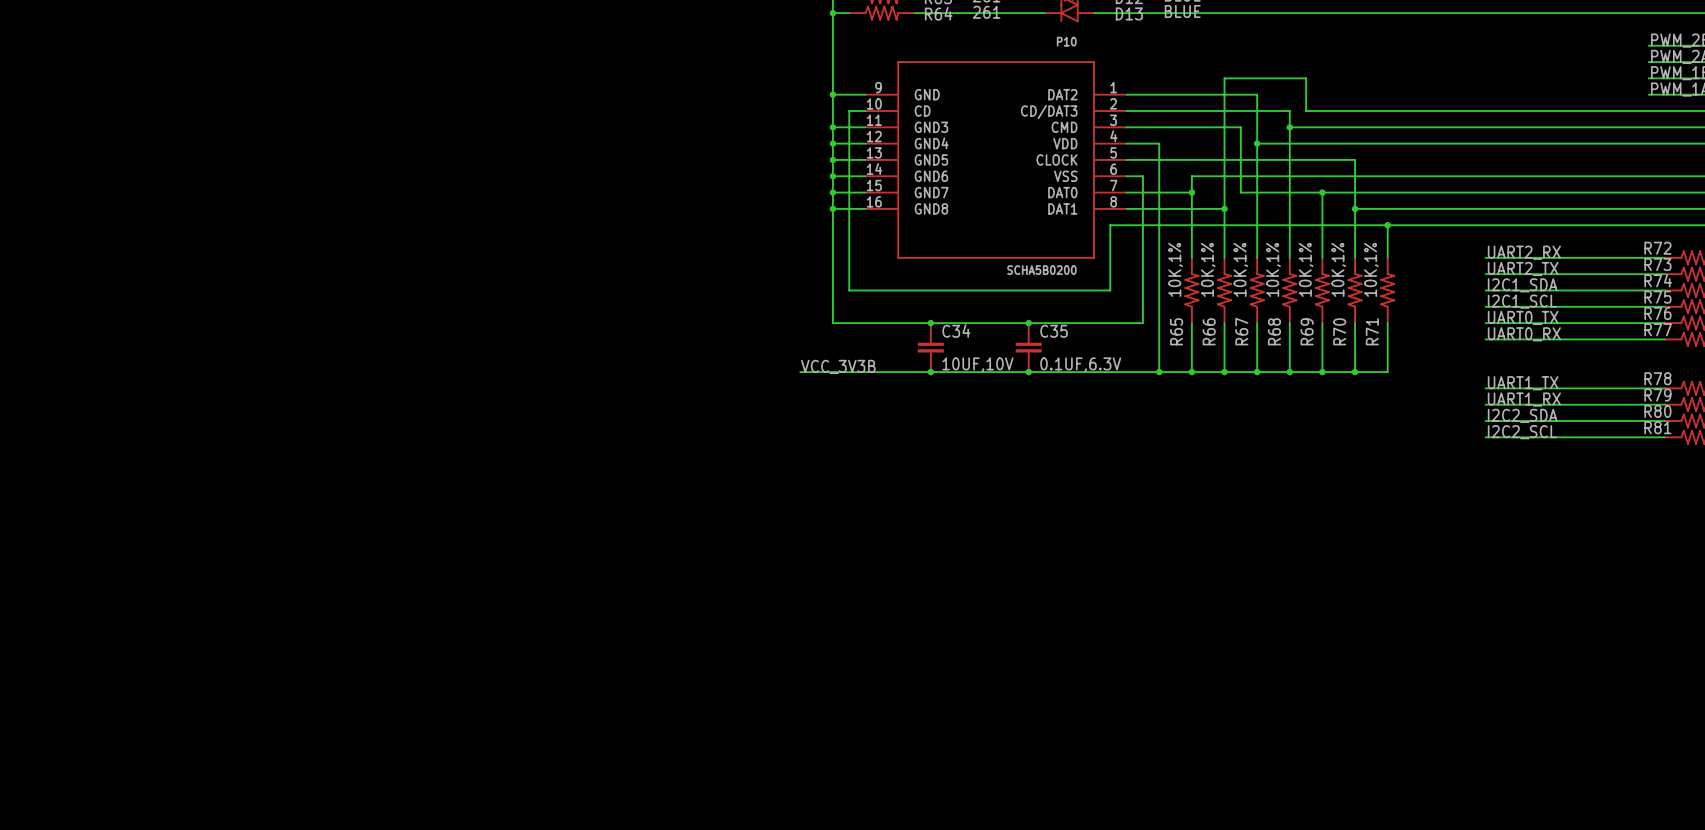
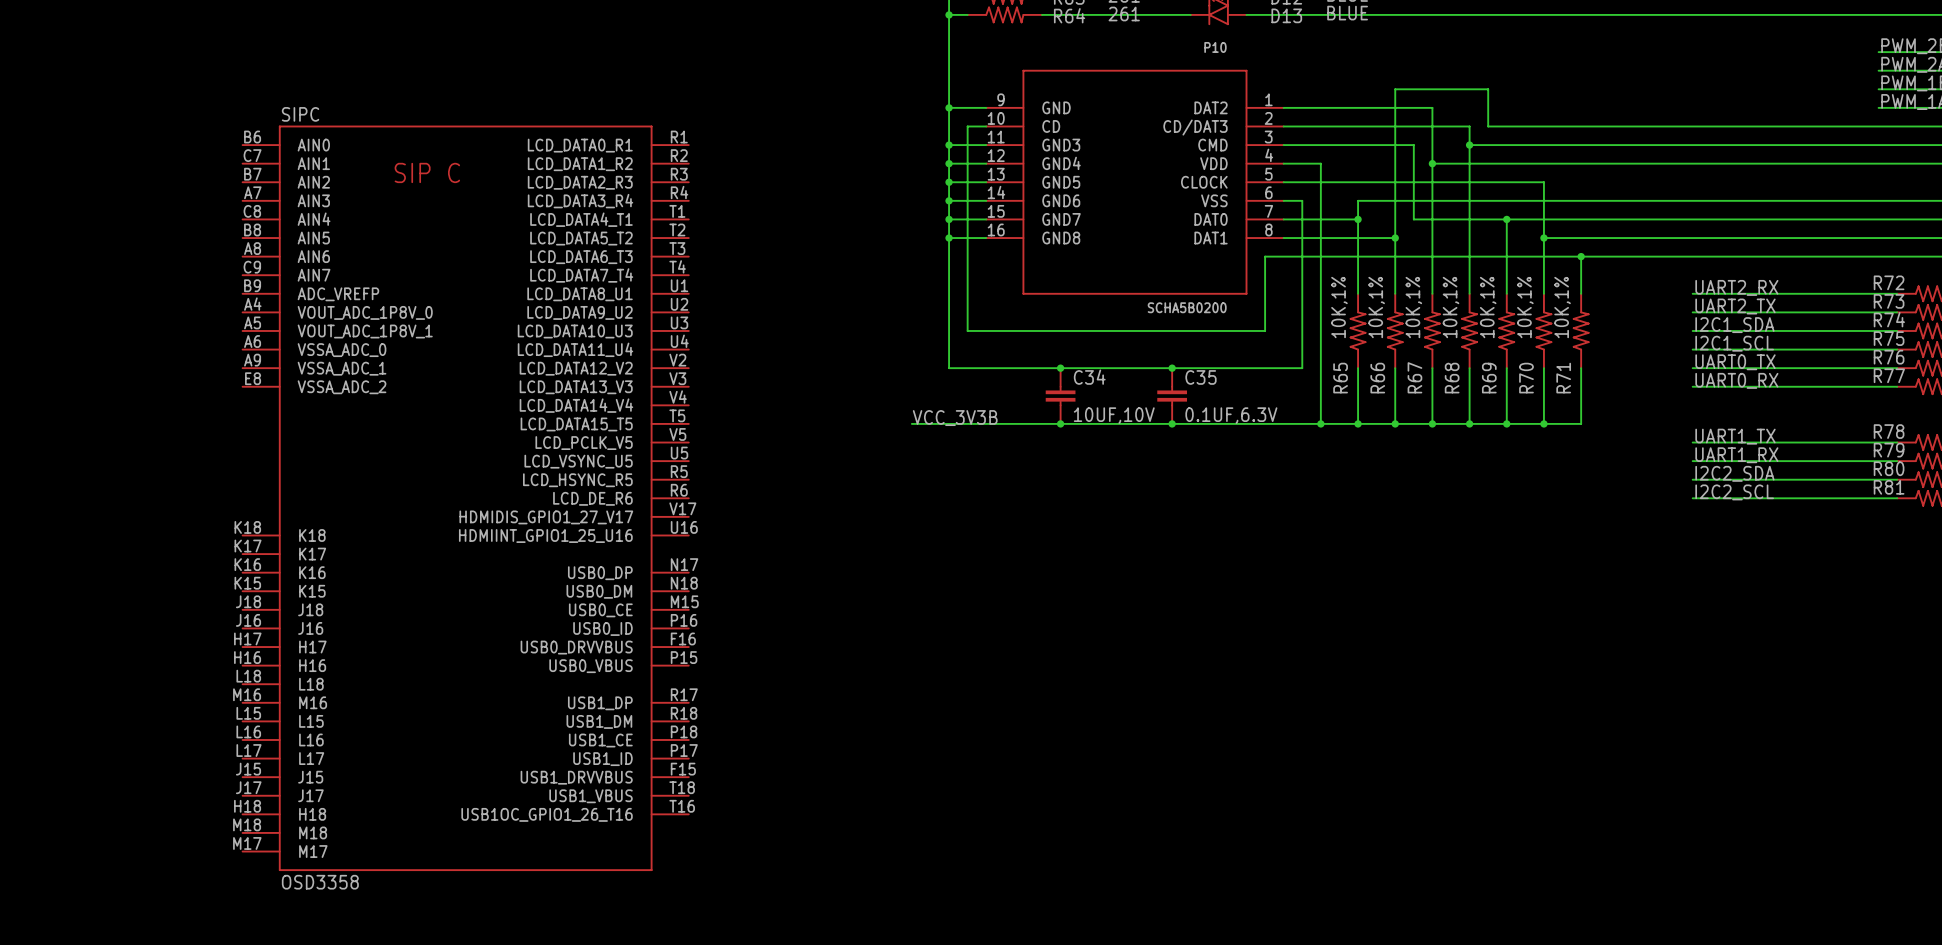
SIPC: none -> OSD3358 (465, 498)

